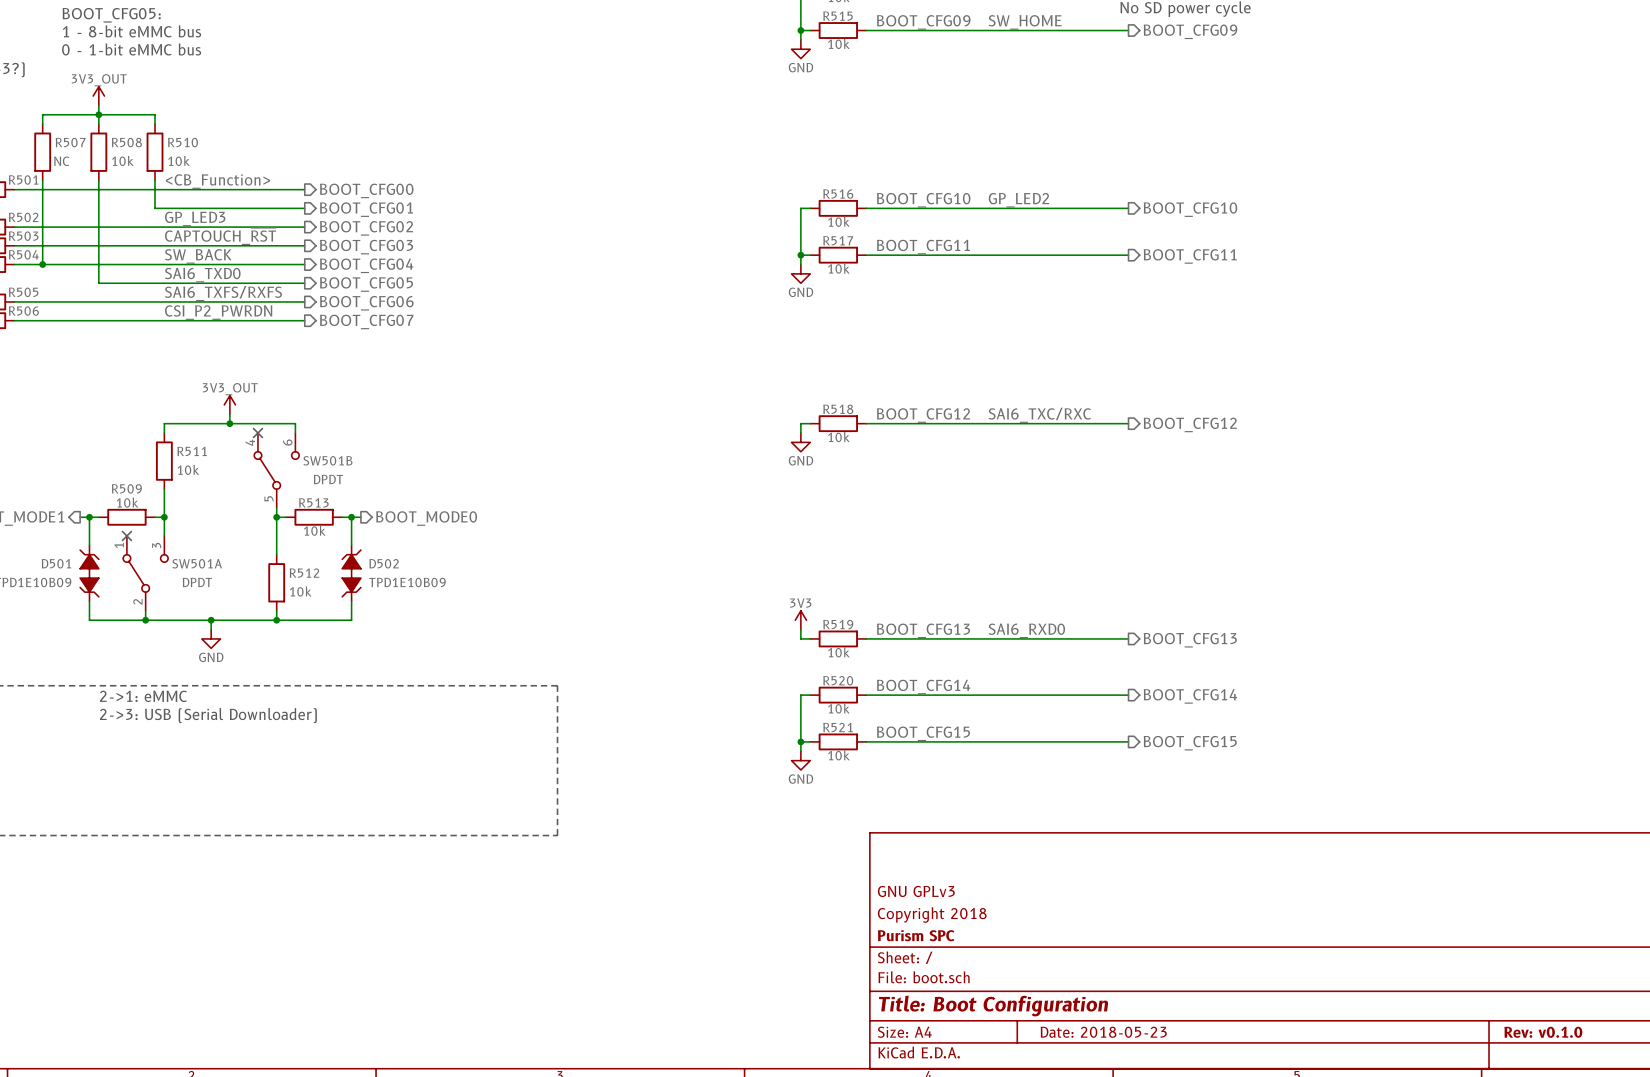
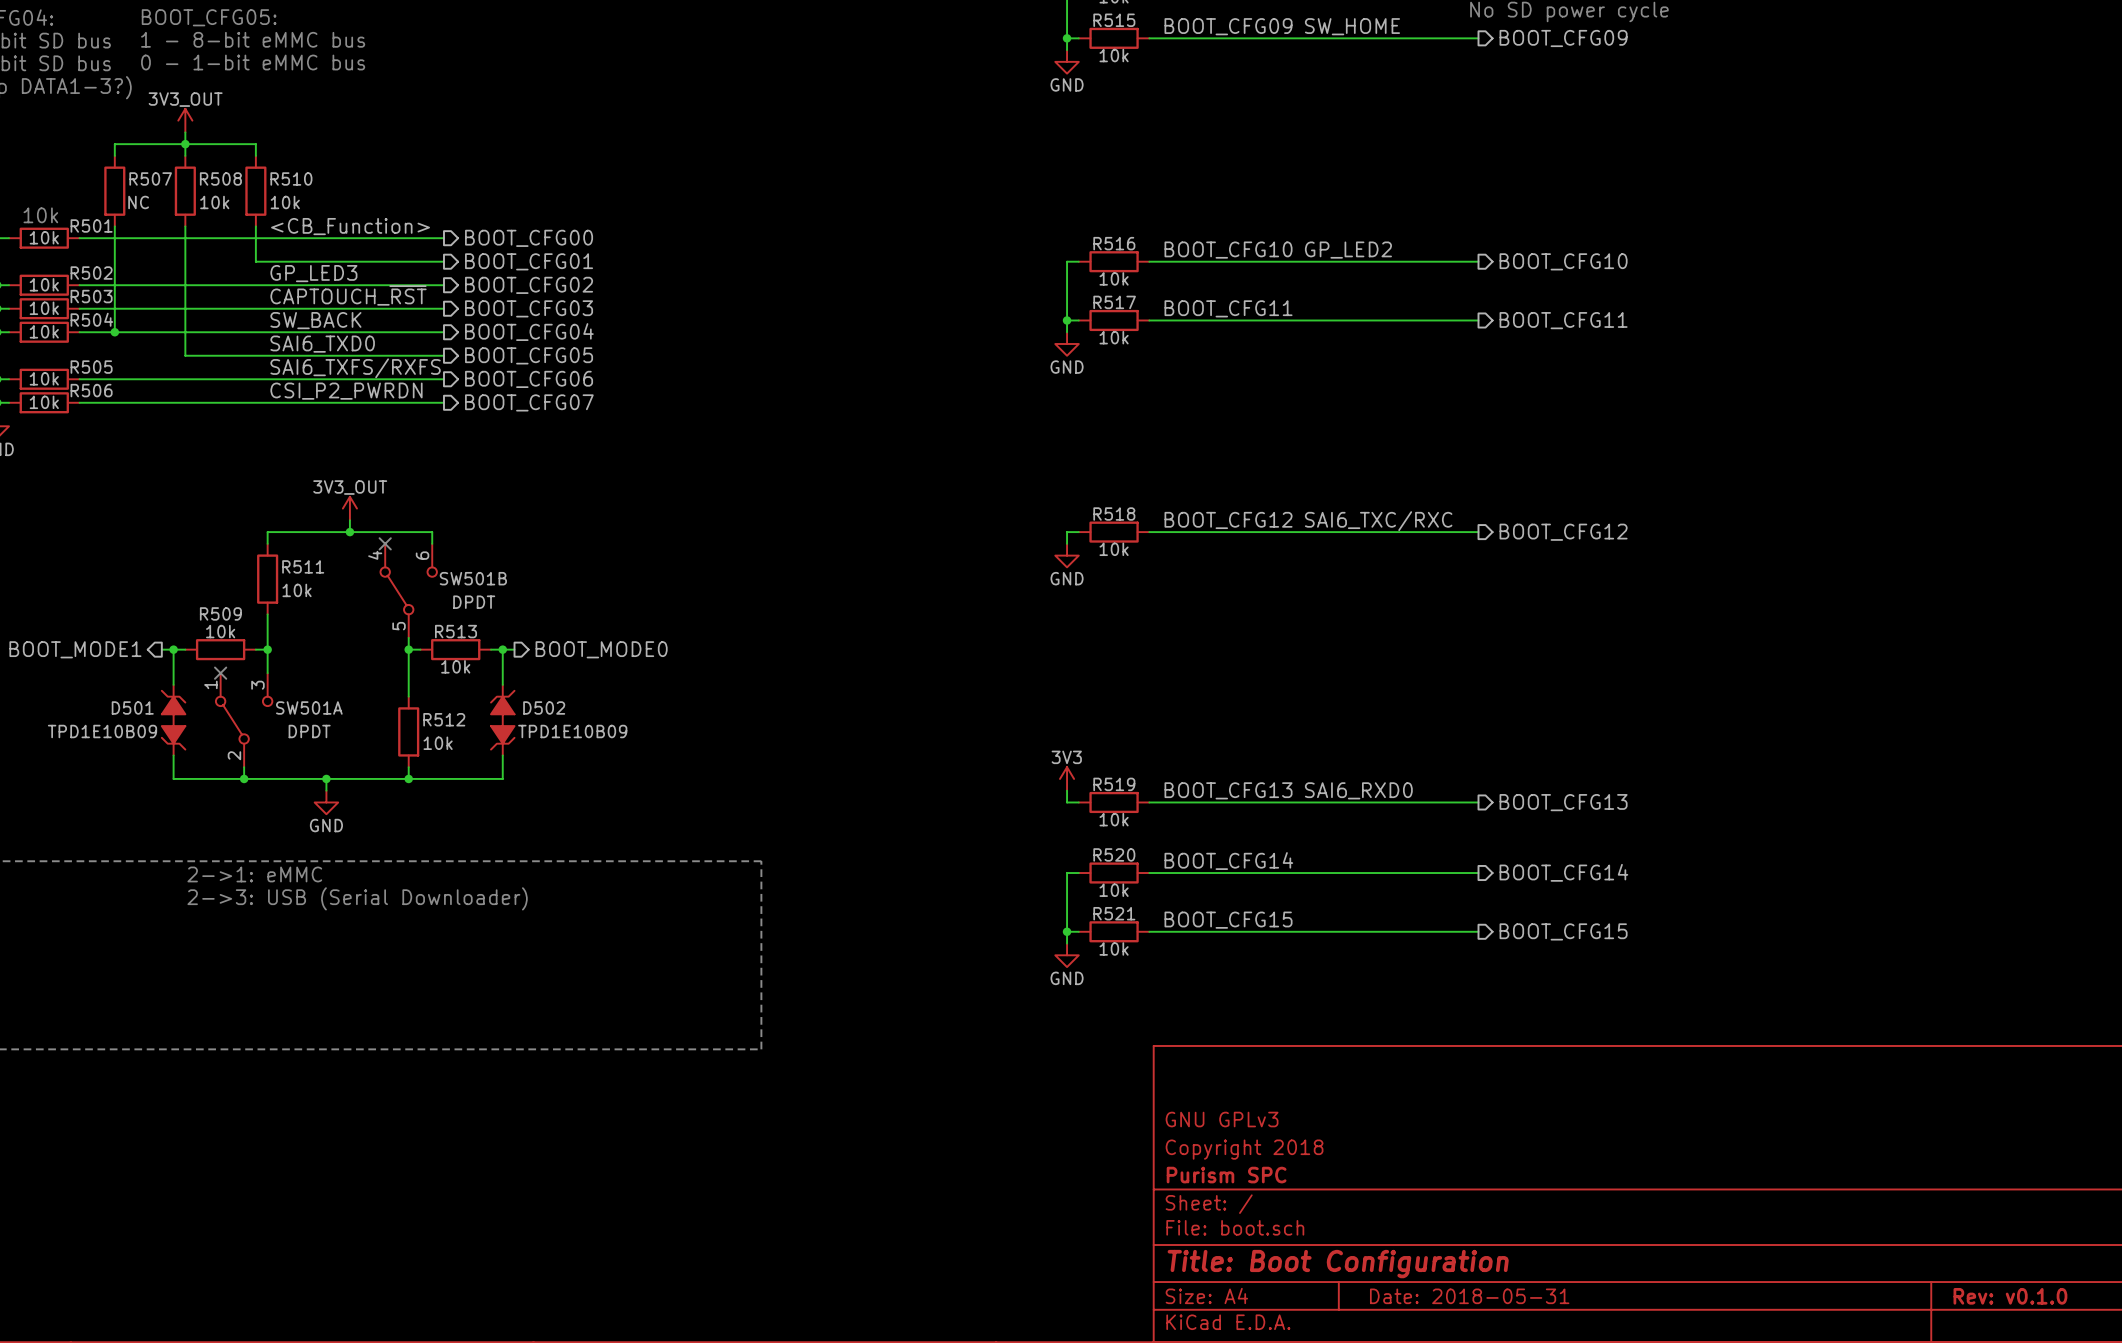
title block: Date: 2018-05-23 (1103, 1032) -> Date: 2018-05-31 (1469, 1296)

